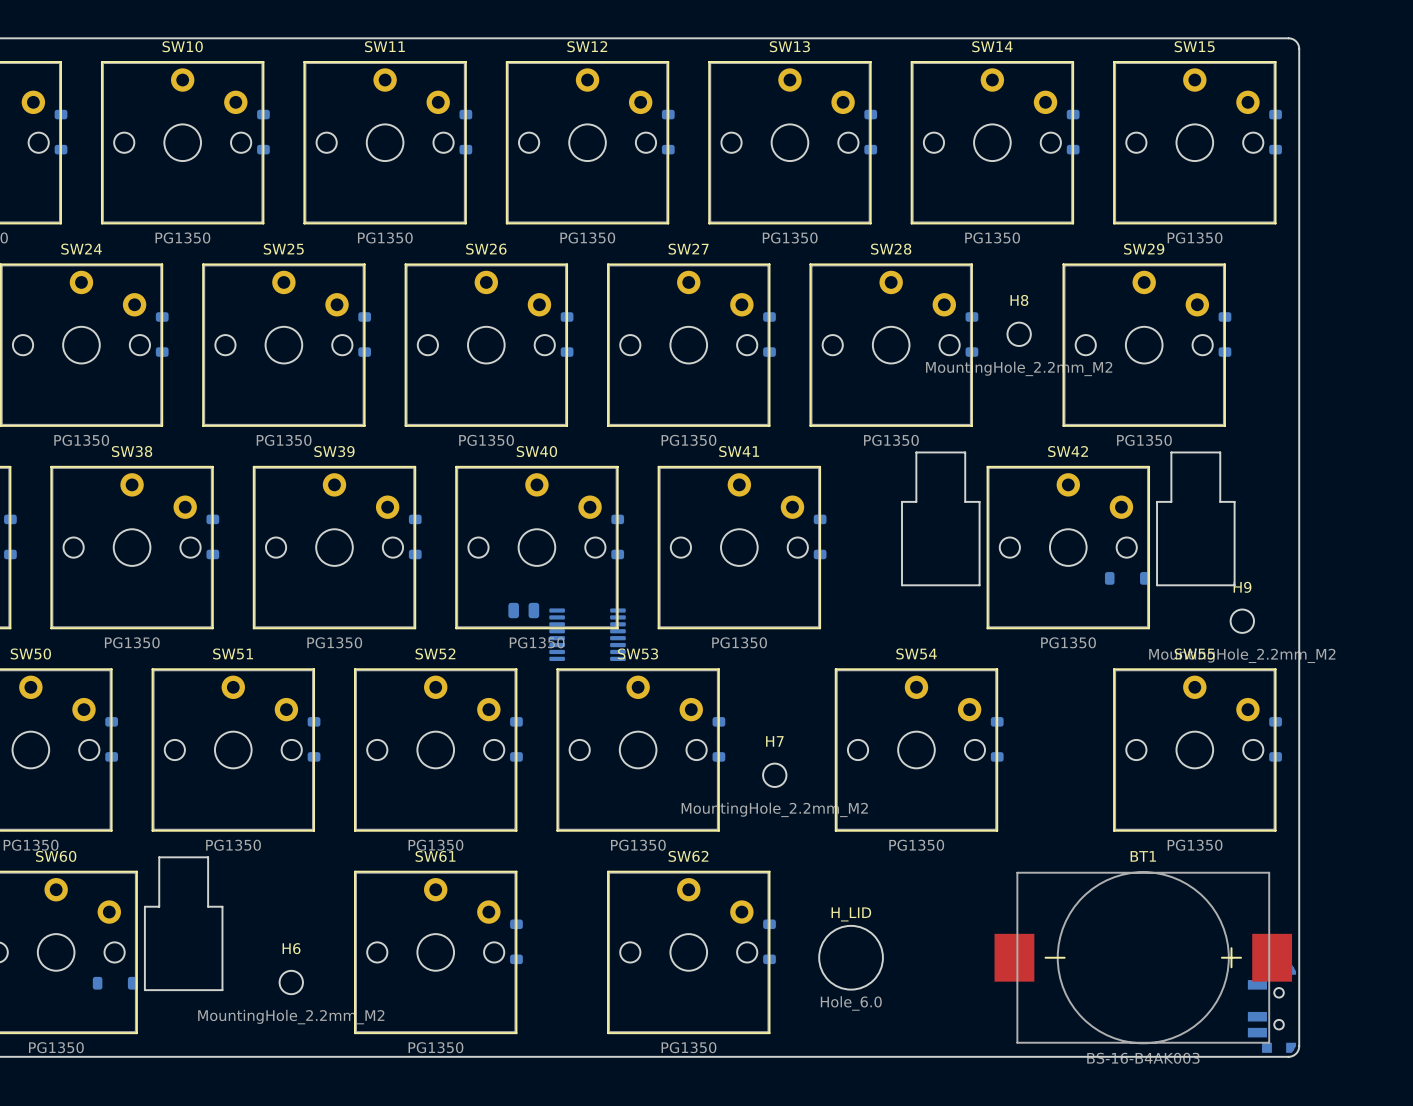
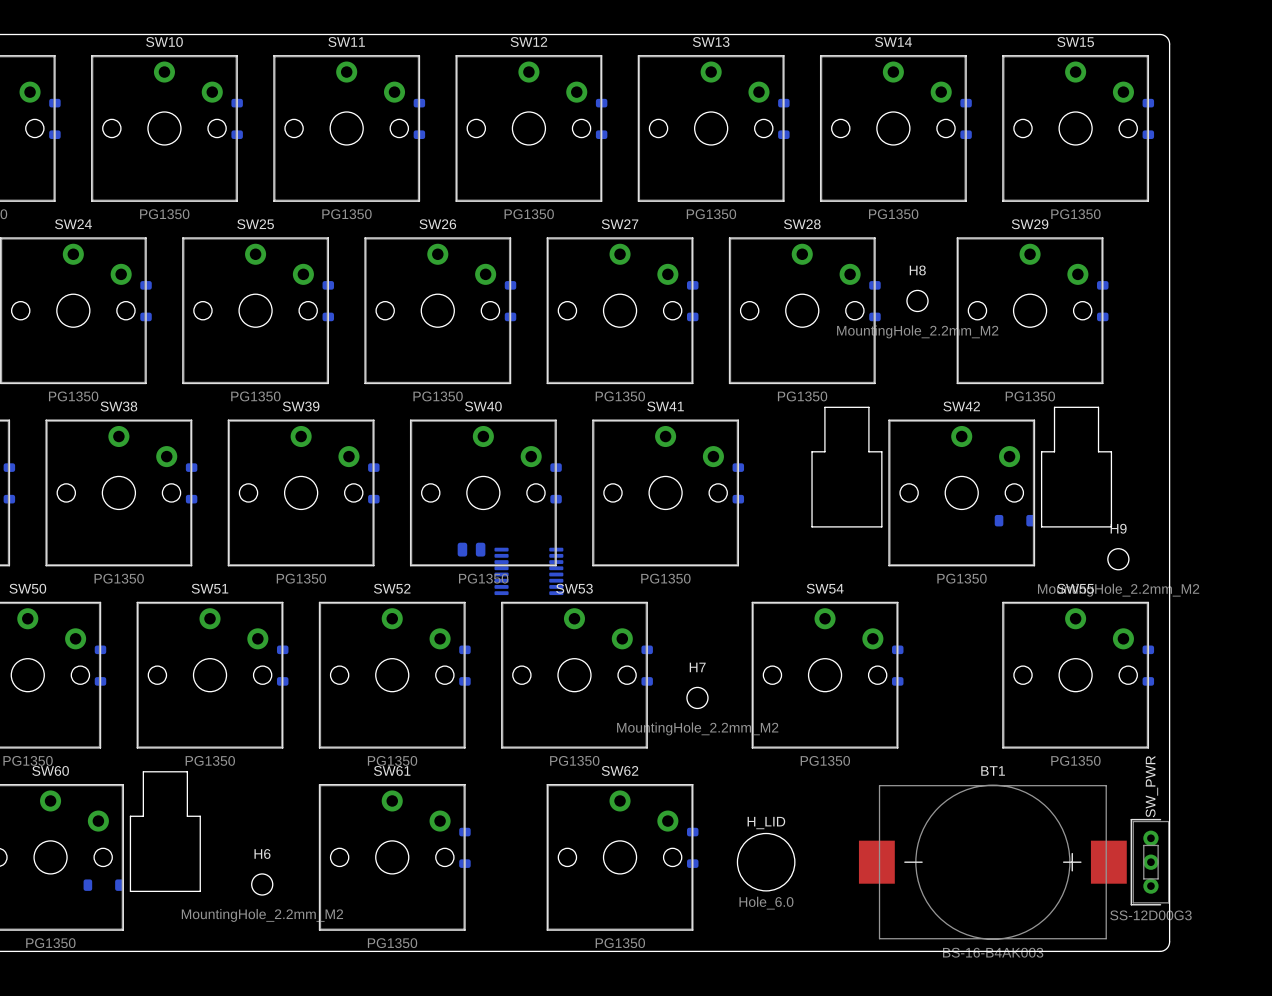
BT1 position: (1143, 957) -> (992, 862)
SW_PWR: none -> SS-12D00G3 (1149, 862)
part: (1271, 1008) -> none

